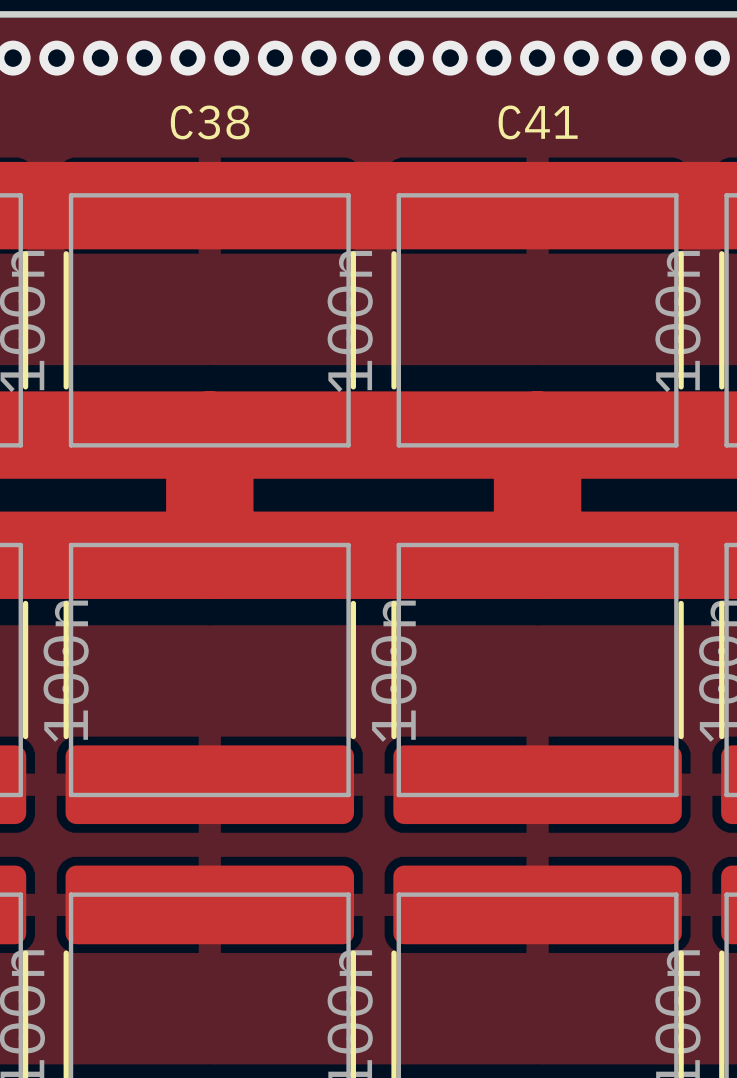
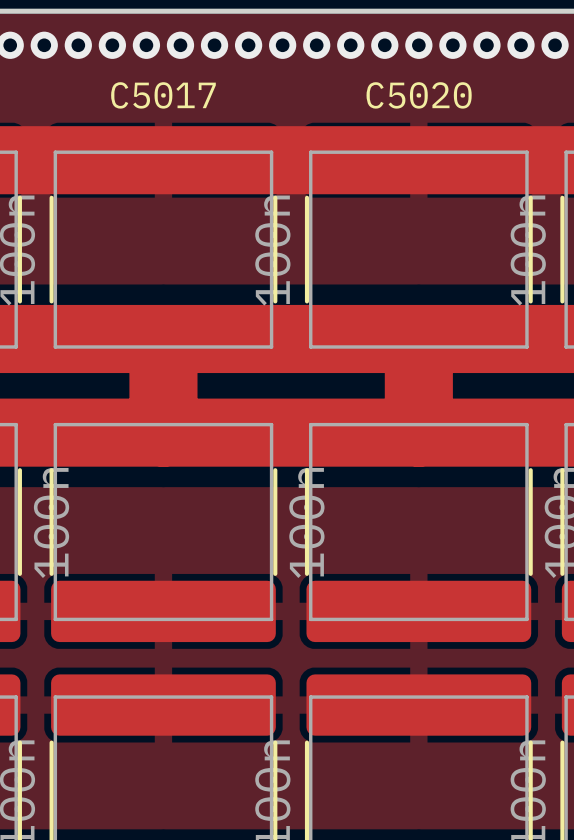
C38 name: C38 (210, 122) -> C5017 (163, 95)
C41 name: C41 (538, 122) -> C5020 (419, 95)

